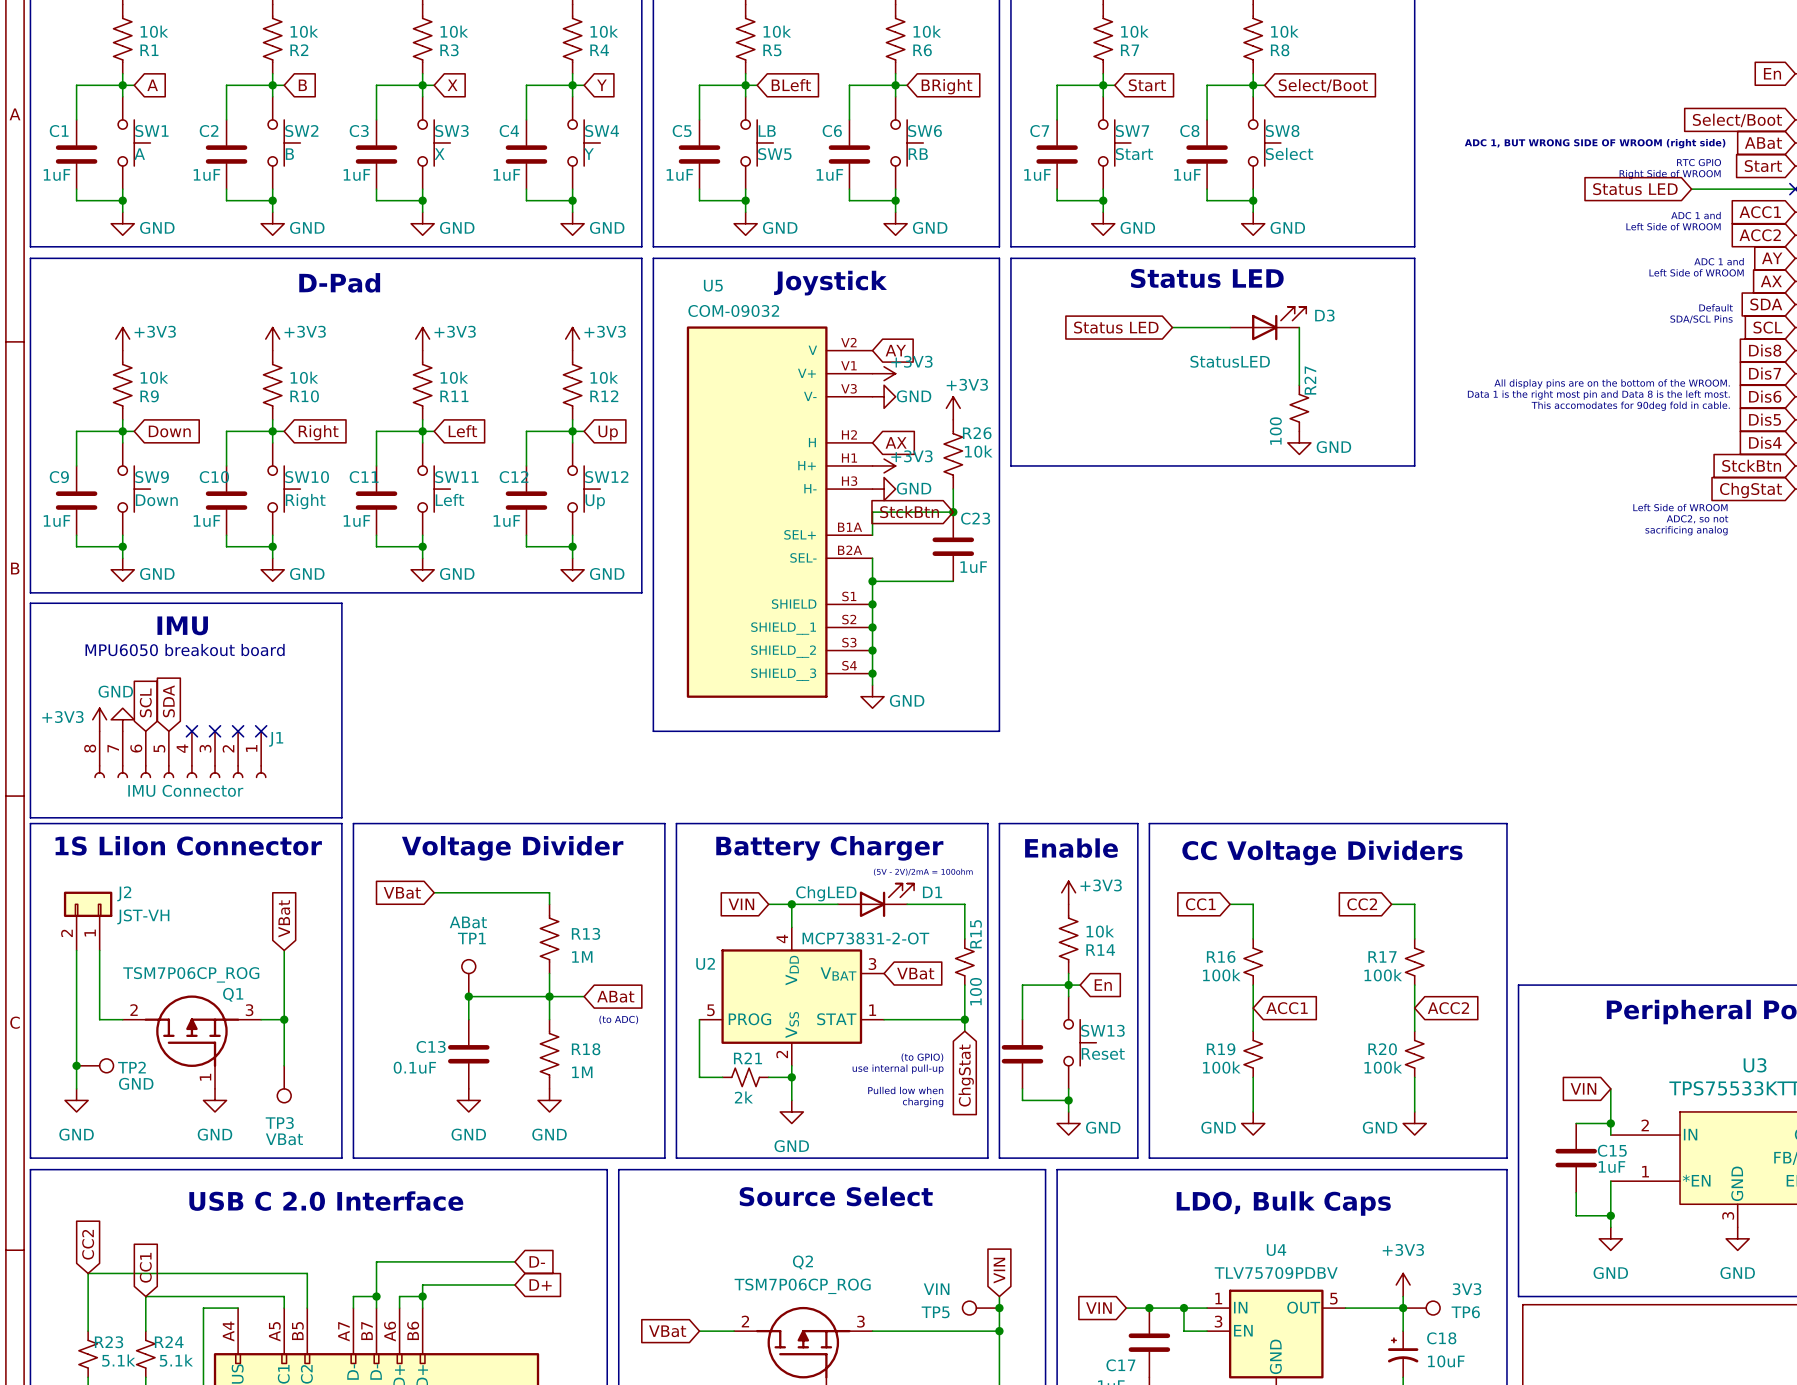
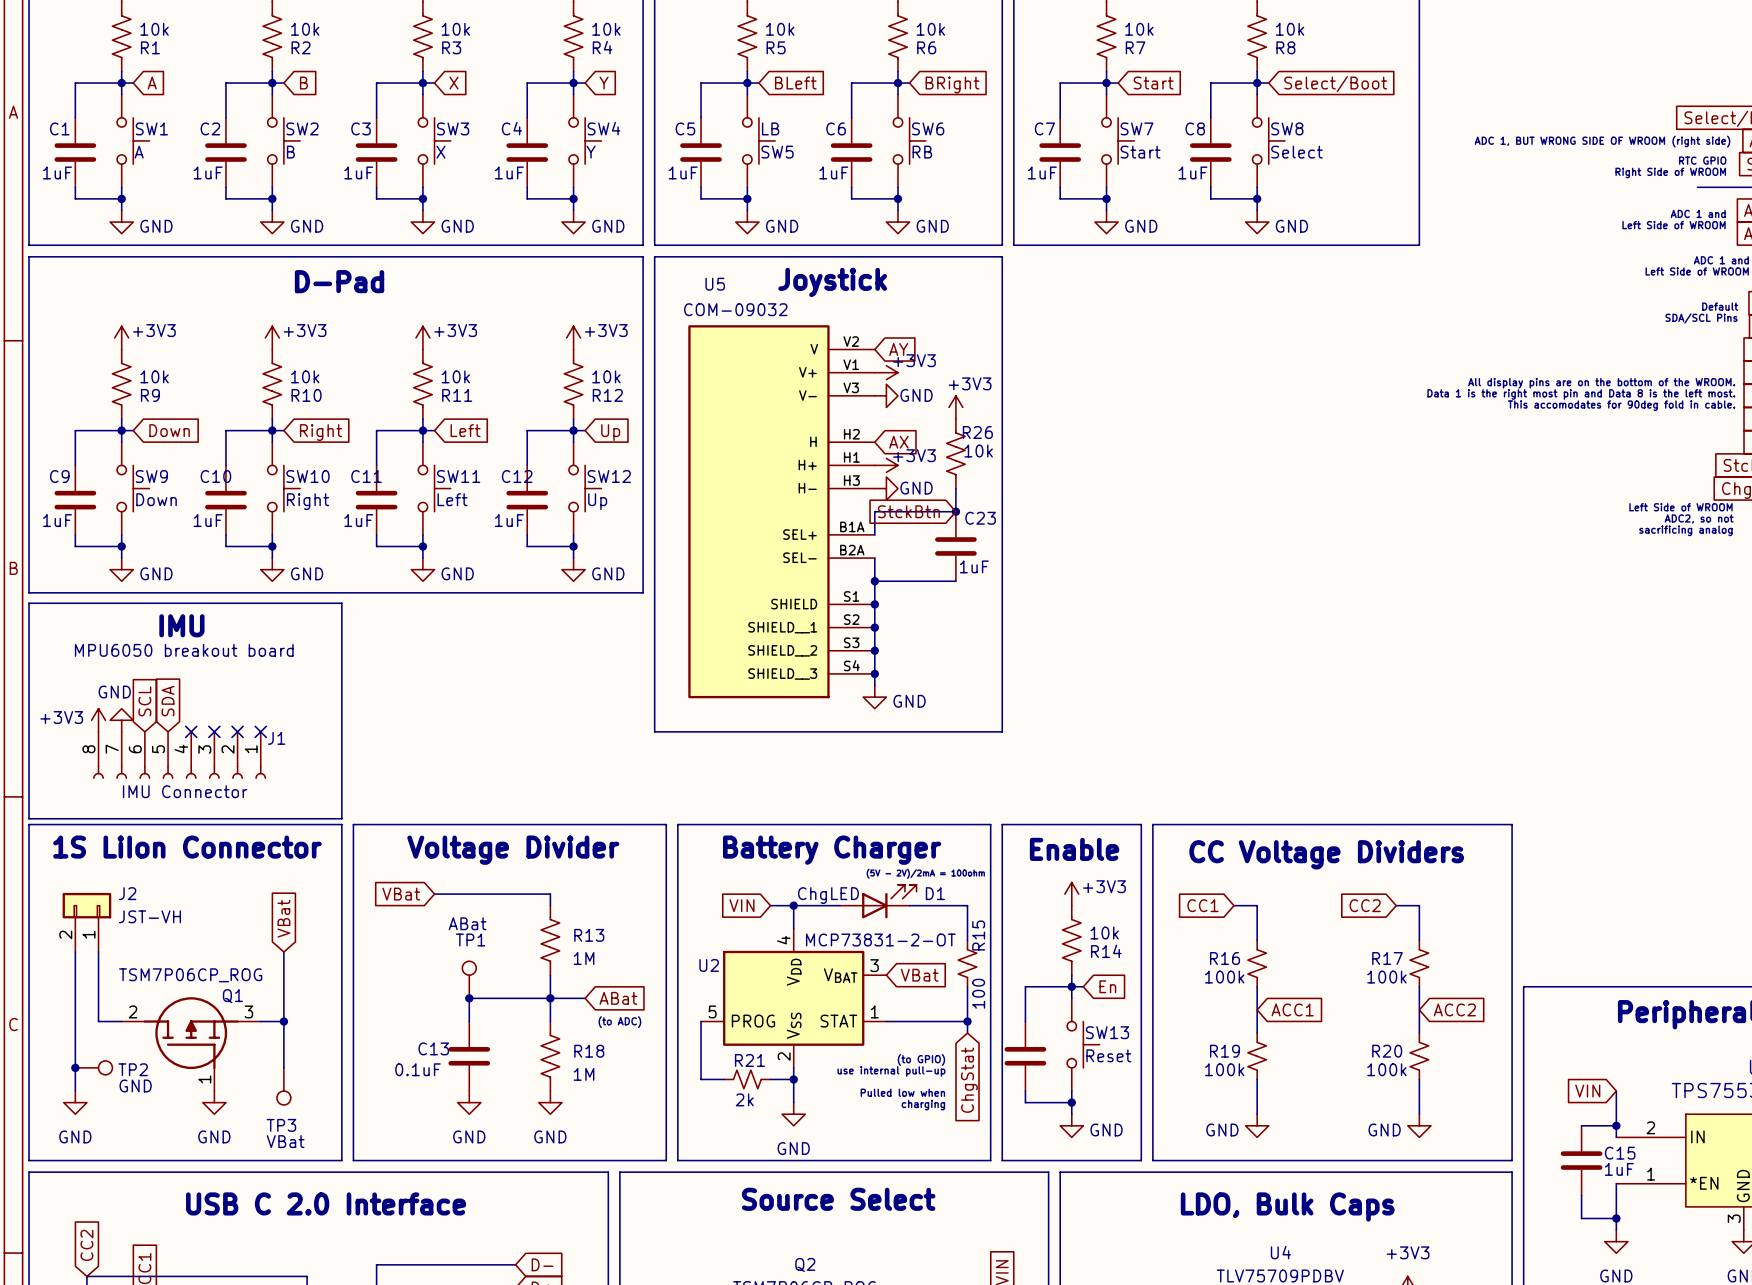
global label: Status LED (1635, 189) -> none
line: (1010, 258) (1414, 258) (1414, 465) (1010, 465) (1010, 258) -> none
text: Status LED (1207, 278) -> none
D3: StatusLED (1268, 323) -> none
global label: Status LED (1116, 327) -> none
wire: (1172, 327) (1230, 327) -> none
wire: (1299, 327) (1299, 385) -> none
R27: 100 (1299, 408) -> none
power symbol: GND (1299, 442) -> none

